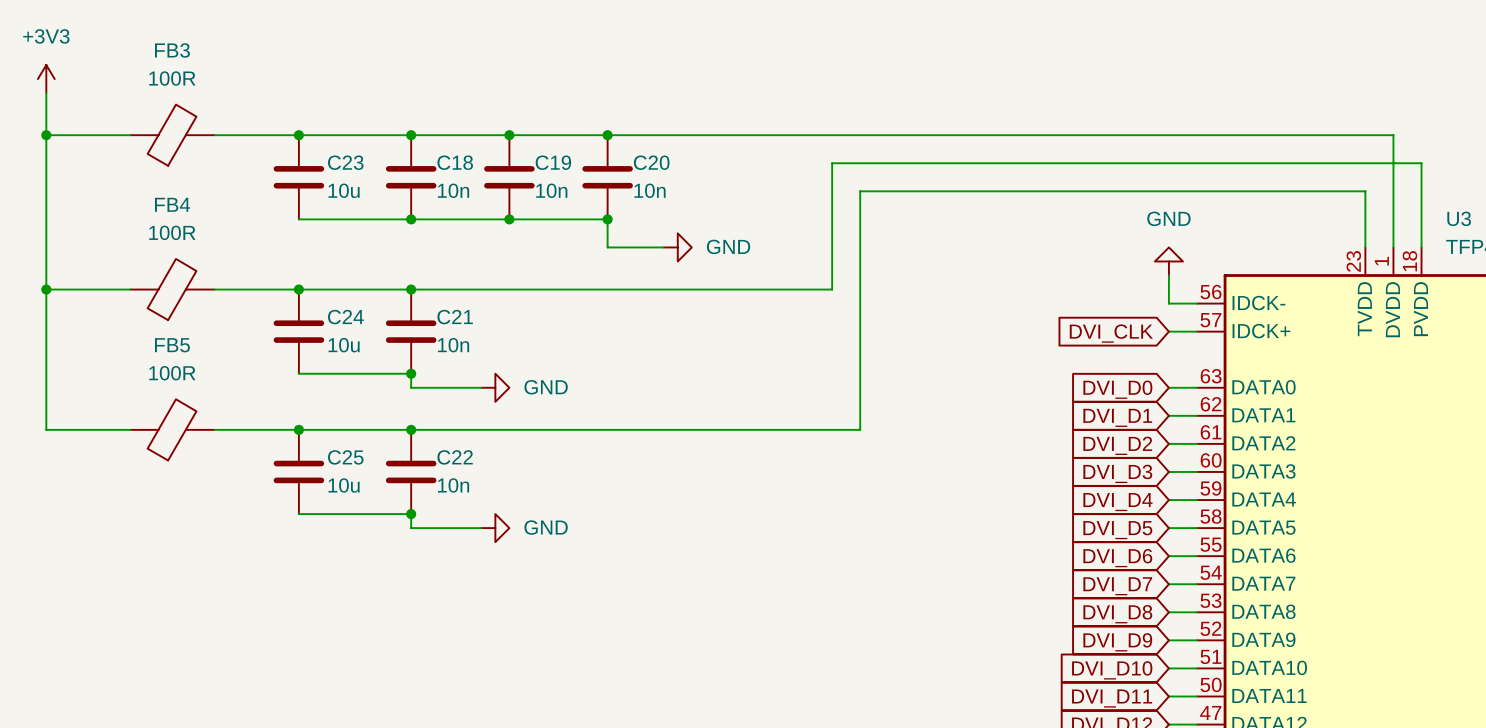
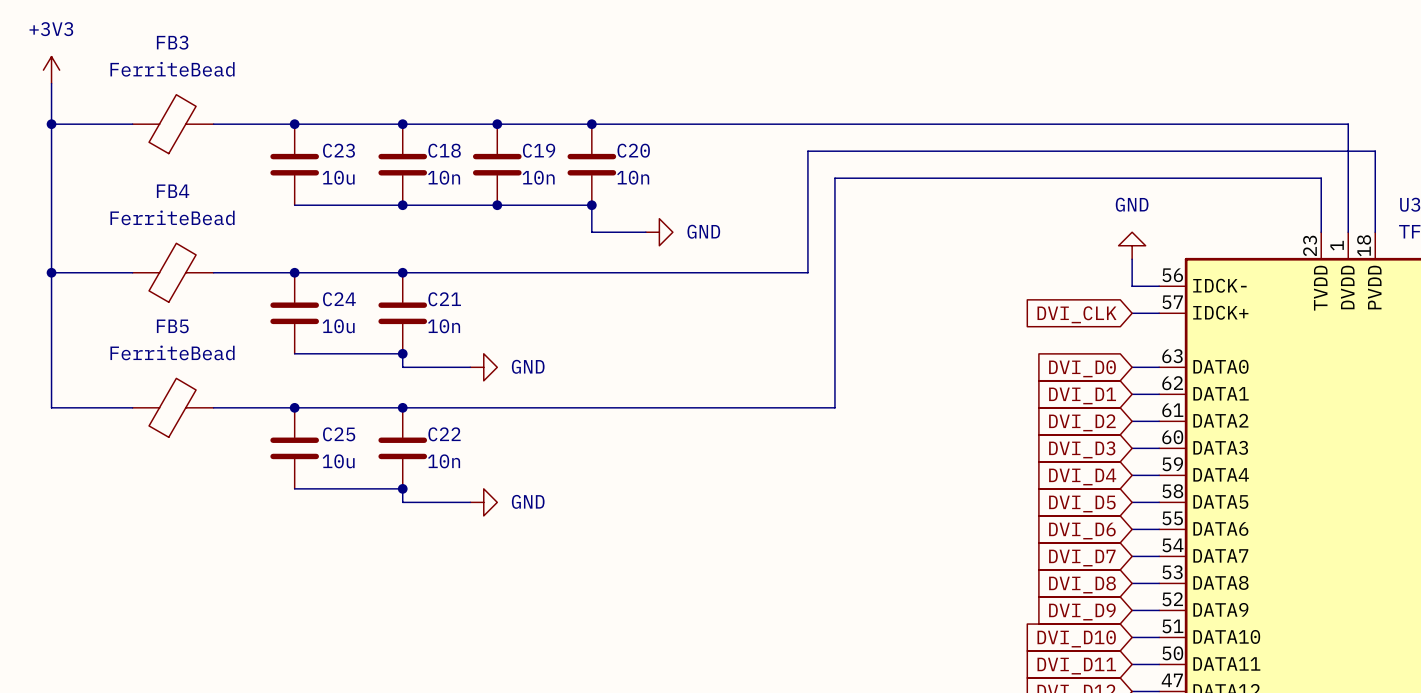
FB3 value: 100R (172, 78) -> FerriteBead (172, 69)
FB4 value: 100R (172, 232) -> FerriteBead (172, 217)
FB5 value: 100R (172, 373) -> FerriteBead (172, 352)

